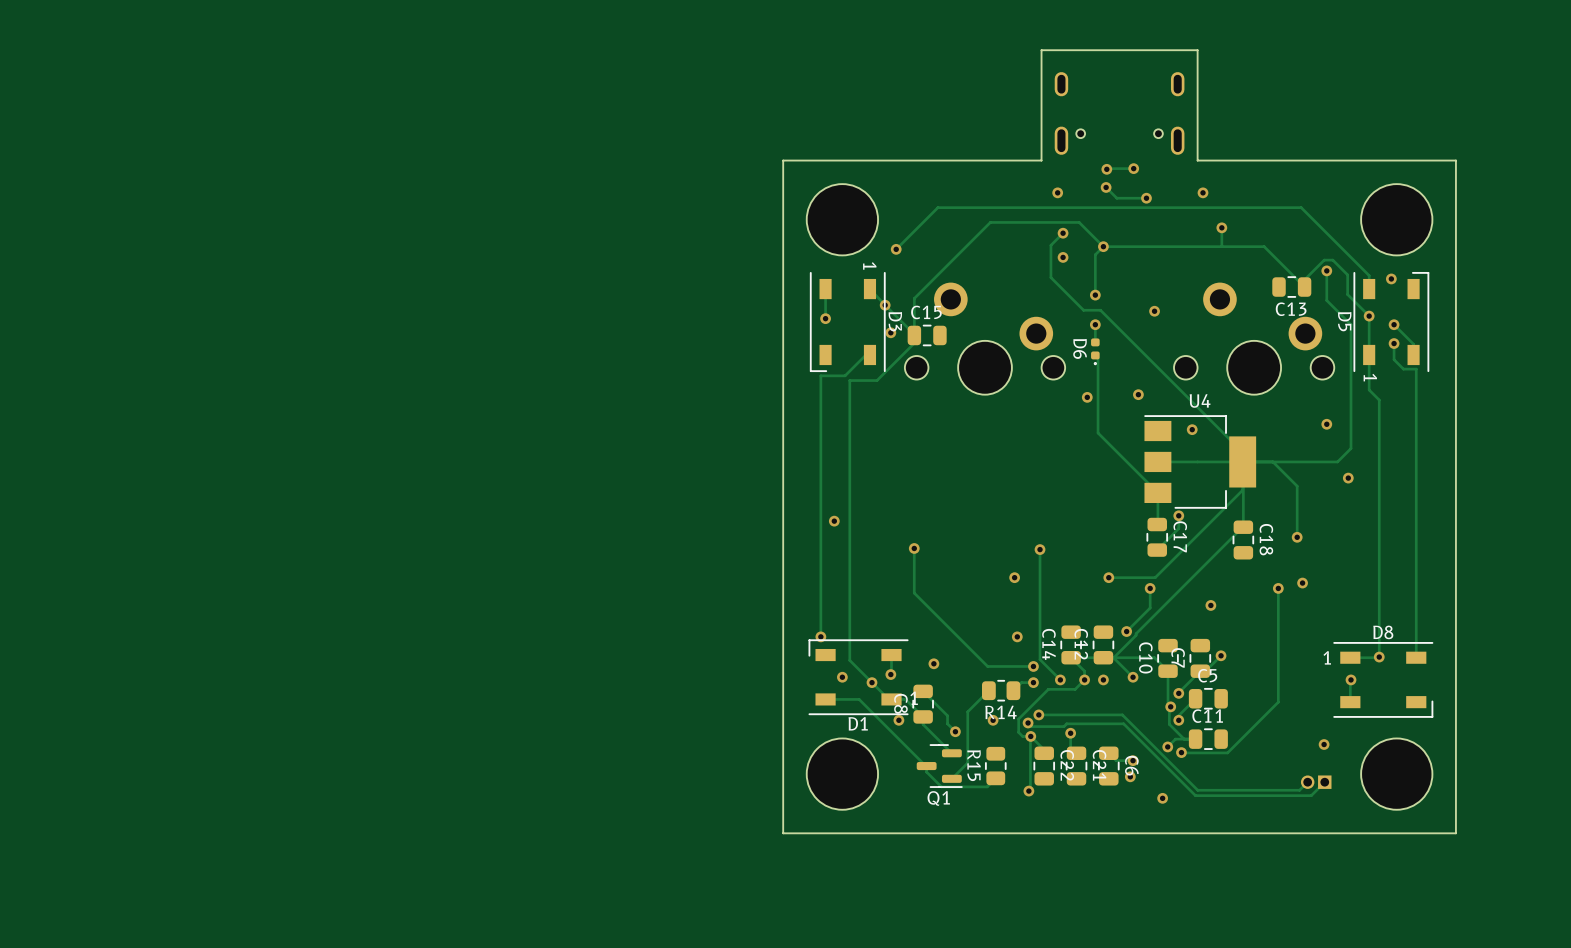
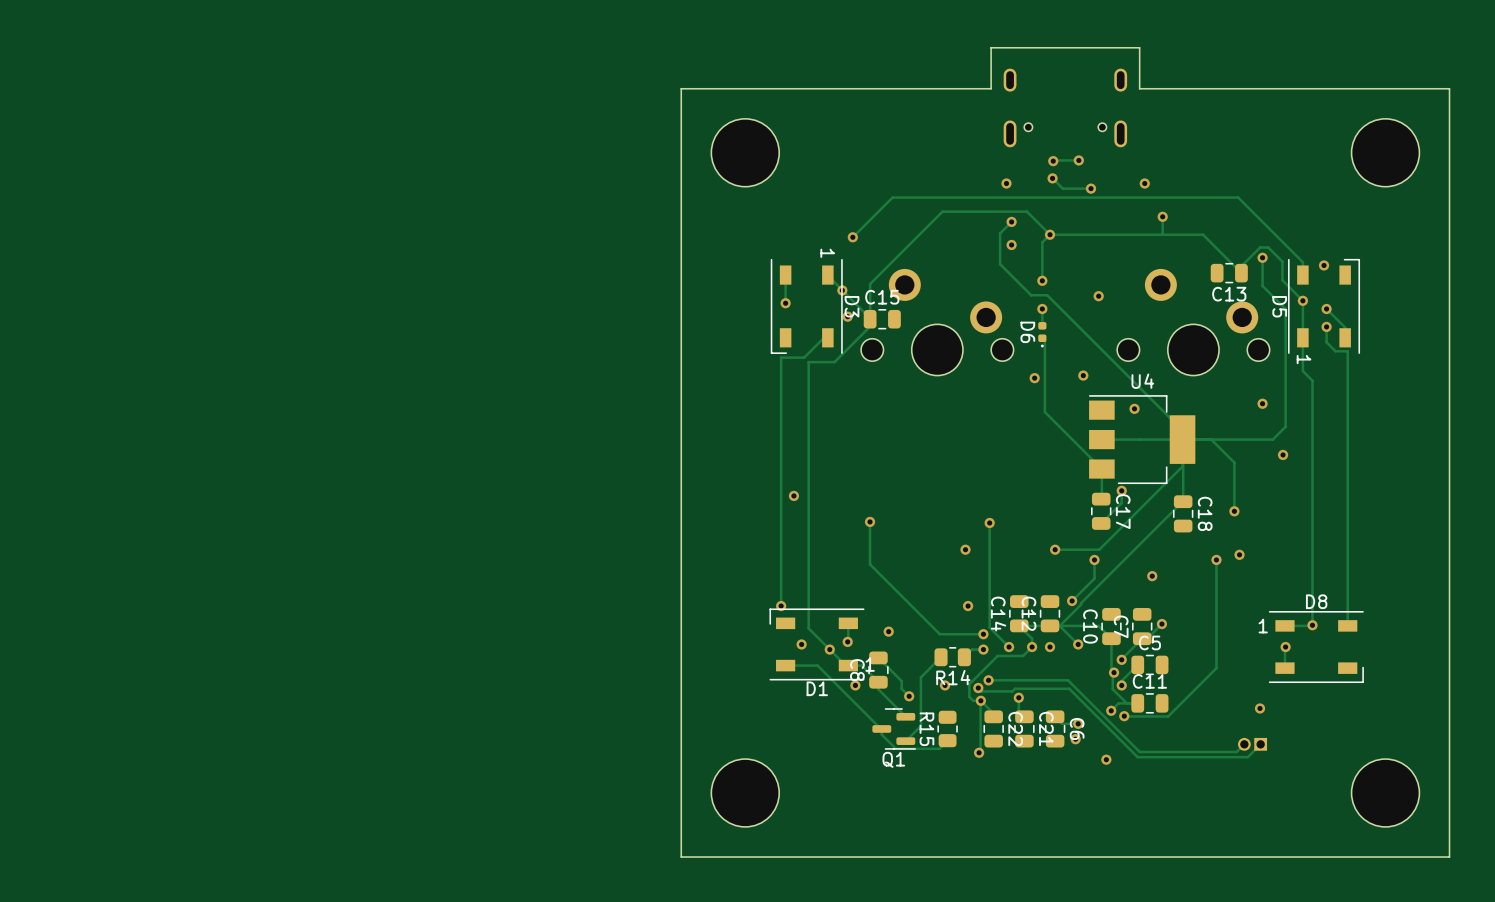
board edge: (1197, 93) (1197, 160) (1455, 160) (1455, 833) (783, 833) (783, 160) (1041, 160) (1041, 93) -> (1139, 88) (1449, 88) (1449, 857) (681, 857) (681, 88) (991, 88)
part position: (842, 219) -> (745, 152)
part position: (1396, 219) -> (1385, 152)
part position: (842, 774) -> (745, 792)
part position: (1396, 774) -> (1385, 792)

